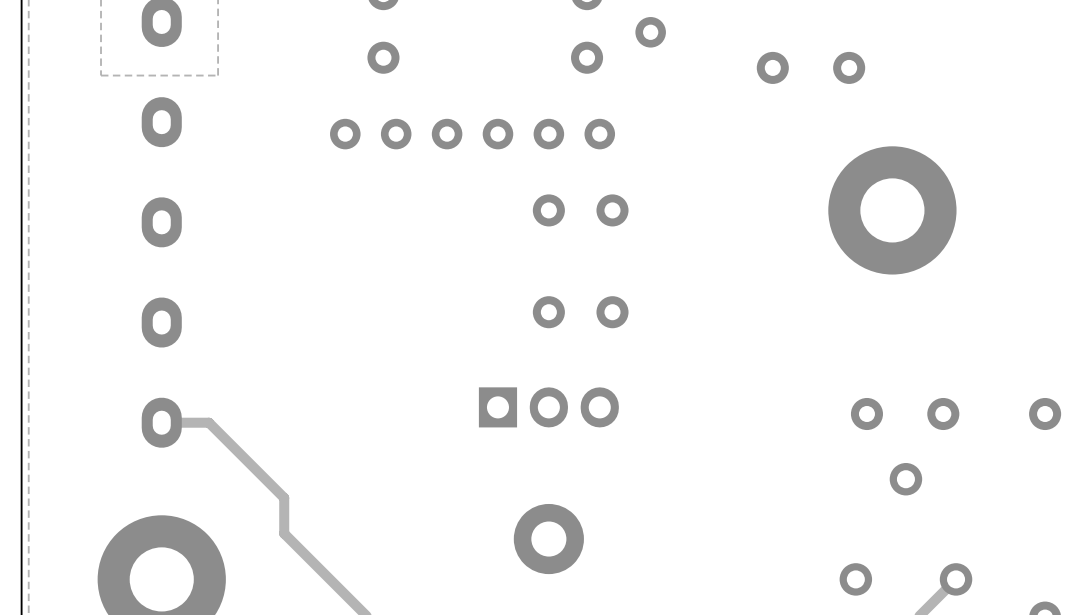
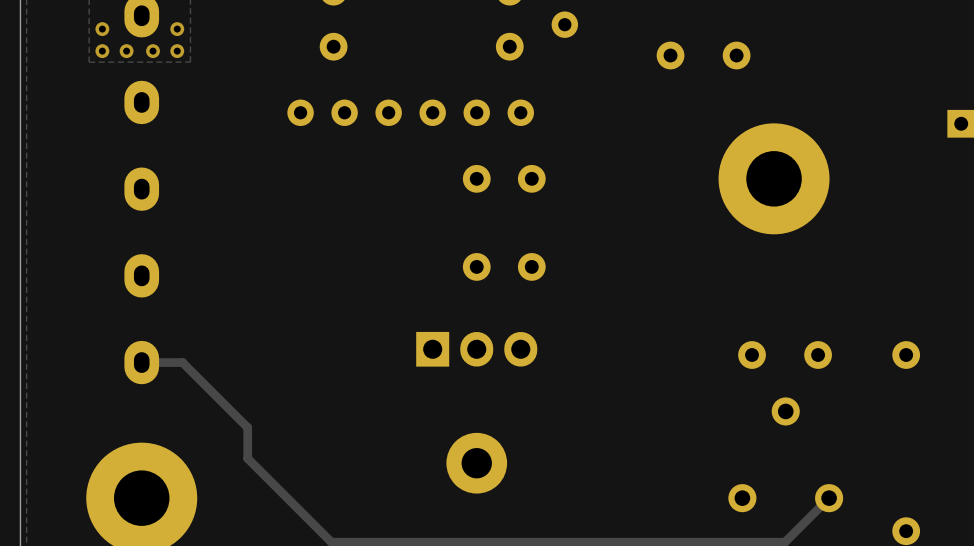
via: none -> (102, 29)
via: none -> (177, 29)
via: none -> (102, 51)
via: none -> (126, 51)
via: none -> (153, 51)
via: none -> (177, 51)

